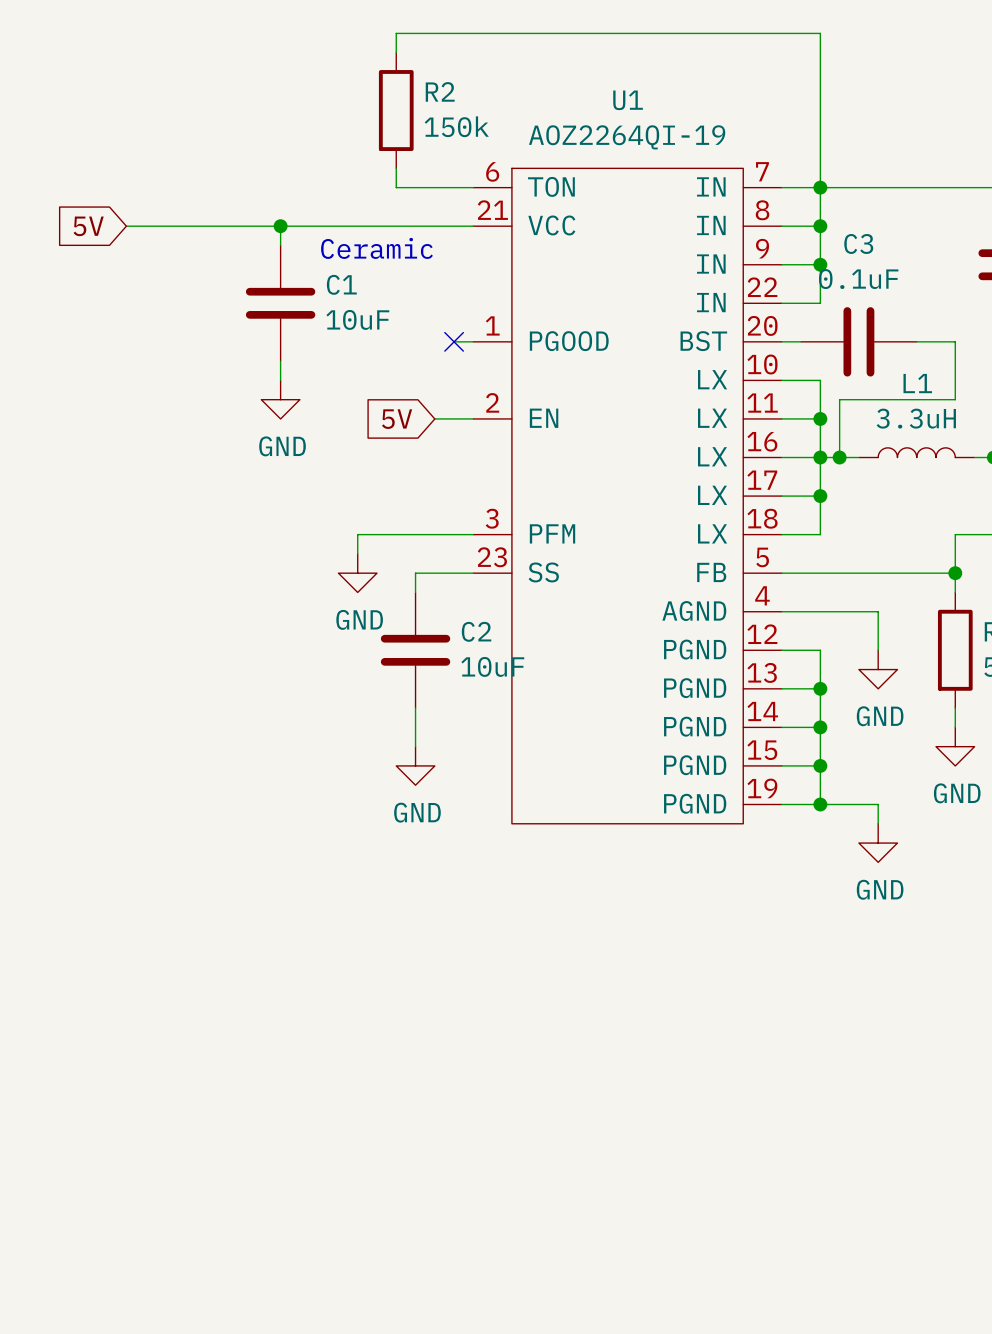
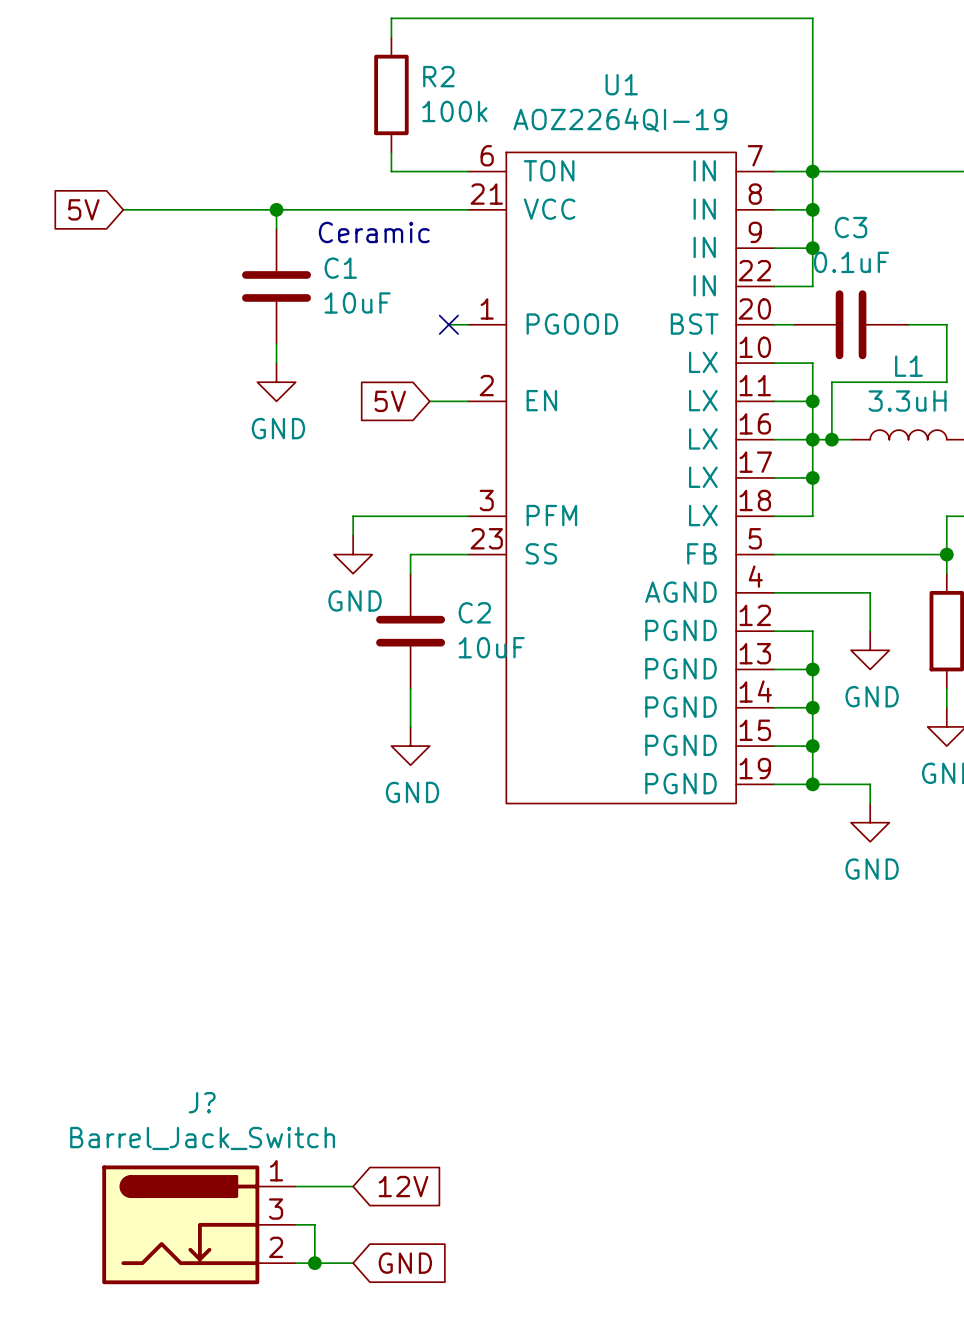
R2 value: 150k (456, 126) -> 100k (454, 111)
wire: none -> (295, 1186) (353, 1186)
global label: none -> 12V (403, 1186)
J?: none -> Barrel_Jack_Switch (198, 1224)
wire: none -> (295, 1224) (314, 1224) (314, 1263)
wire: none -> (295, 1263) (353, 1263)
junction: none -> (314, 1263)
global label: none -> GND (405, 1263)

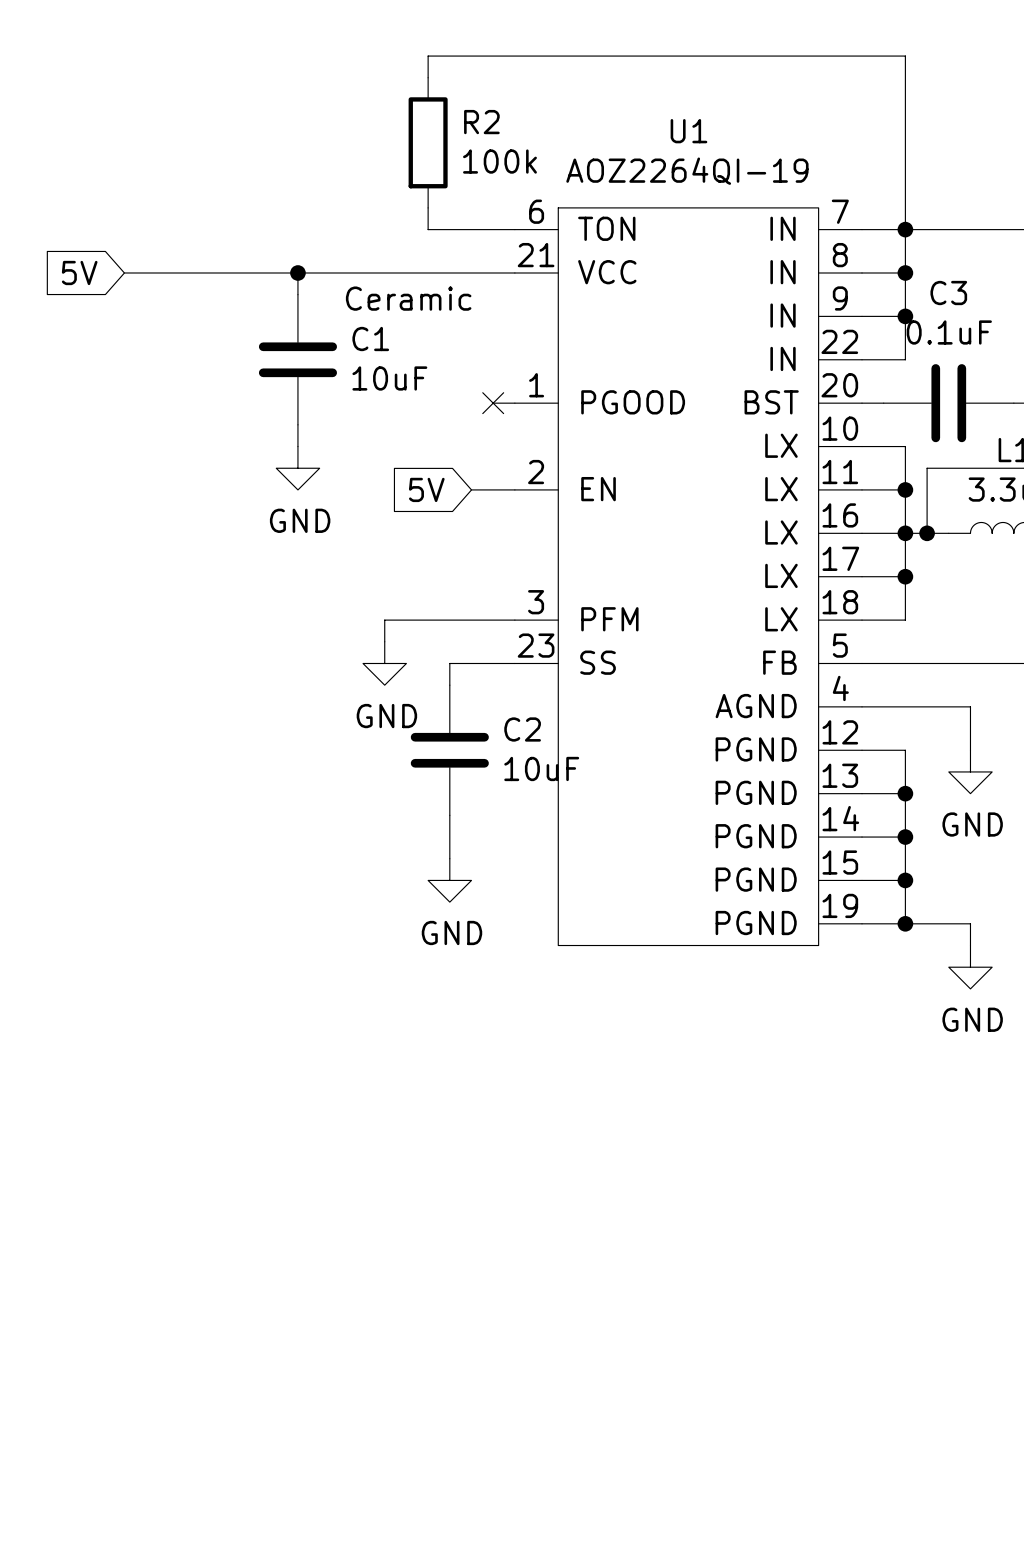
wire: (295, 1186) (353, 1186) -> none
global label: 12V (403, 1186) -> none
J?: Barrel_Jack_Switch (198, 1224) -> none
wire: (295, 1224) (314, 1224) (314, 1263) -> none
wire: (295, 1263) (353, 1263) -> none
junction: (314, 1263) -> none
global label: GND (405, 1263) -> none

